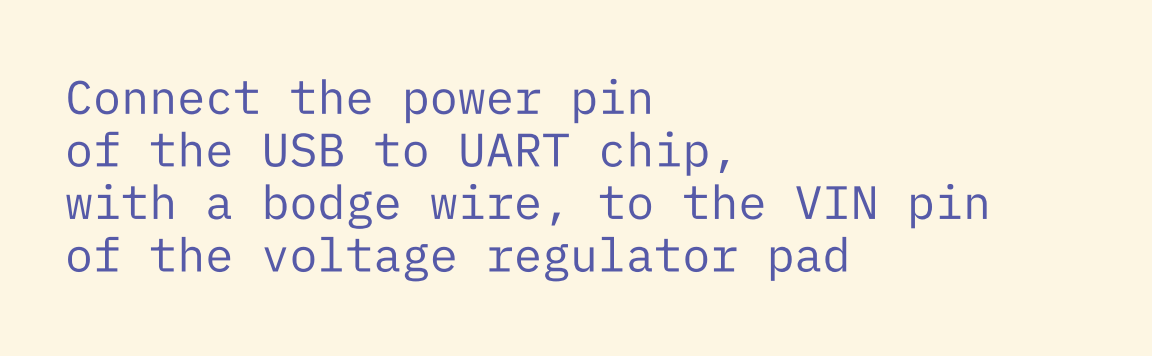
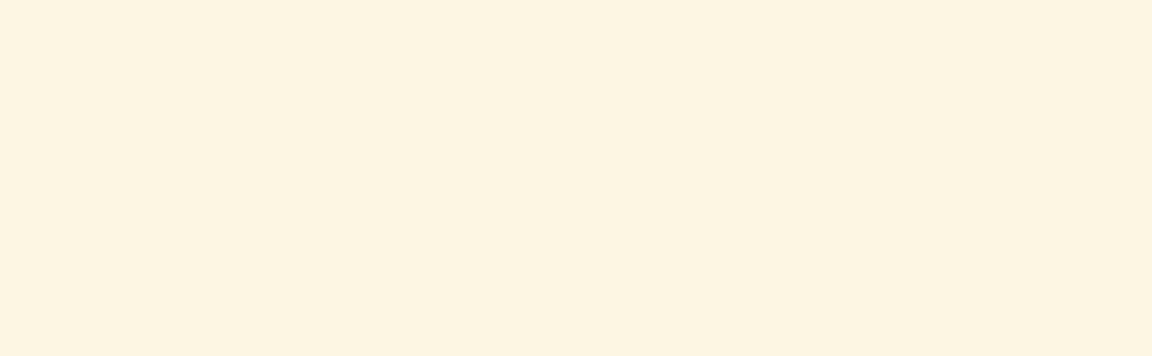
text: Connect the power pin (359, 101) -> none
text: of the USB to UART chip, (398, 153) -> none
text: with a bodge wire, to the VIN pin (526, 206) -> none
text: of the voltage regulator pad (457, 259) -> none

